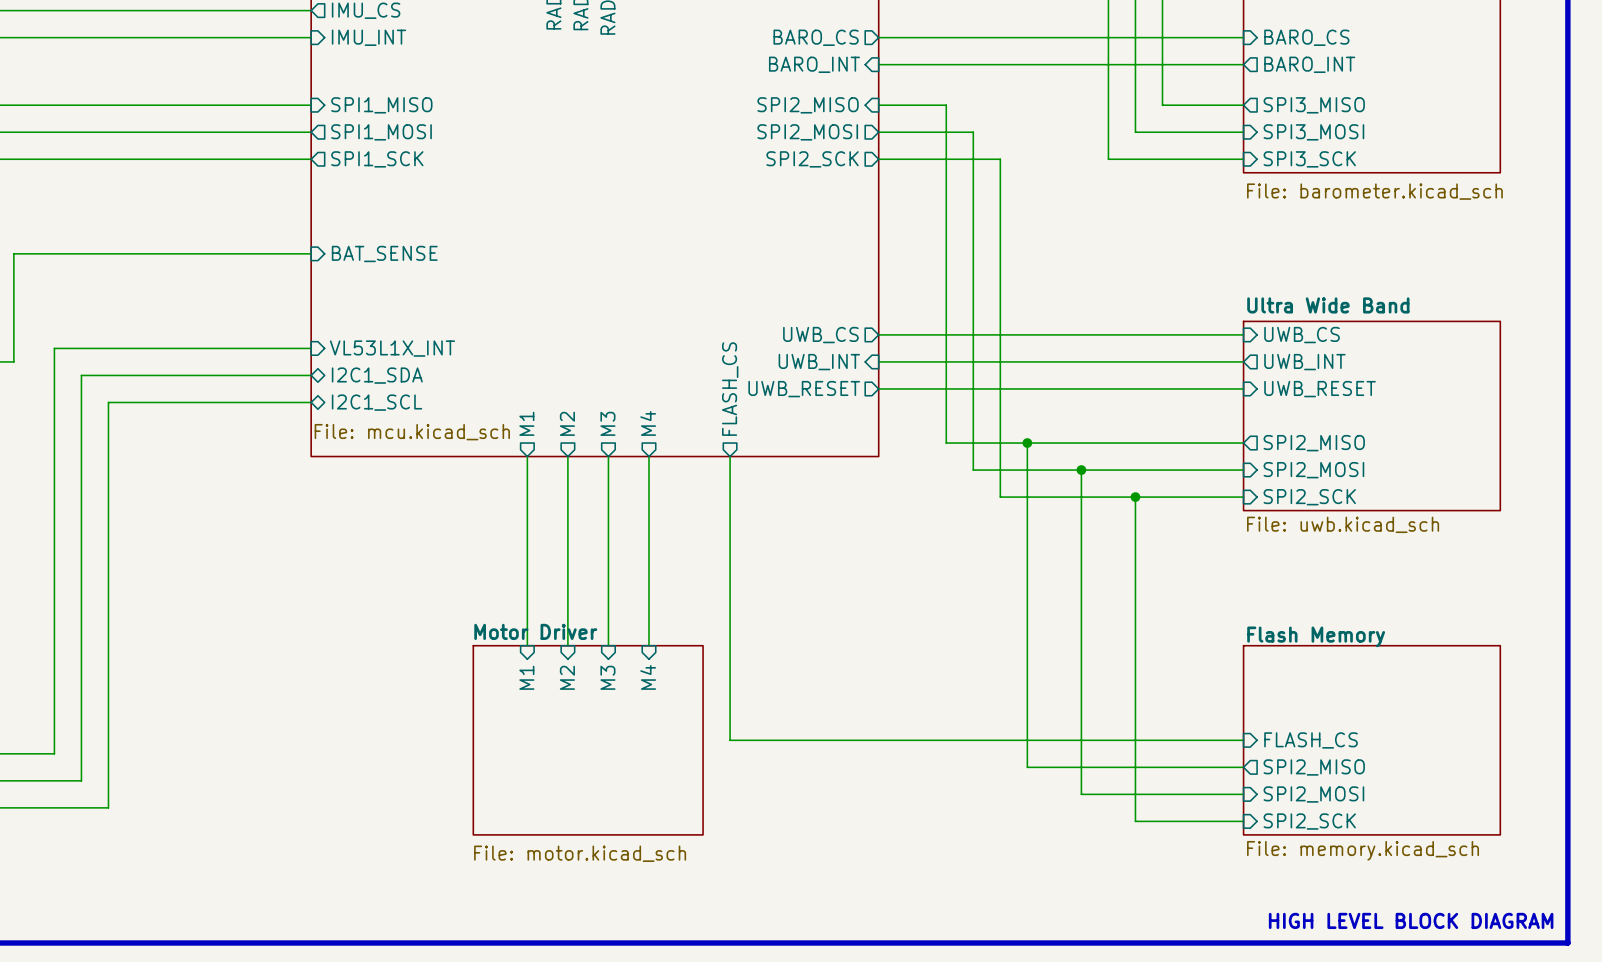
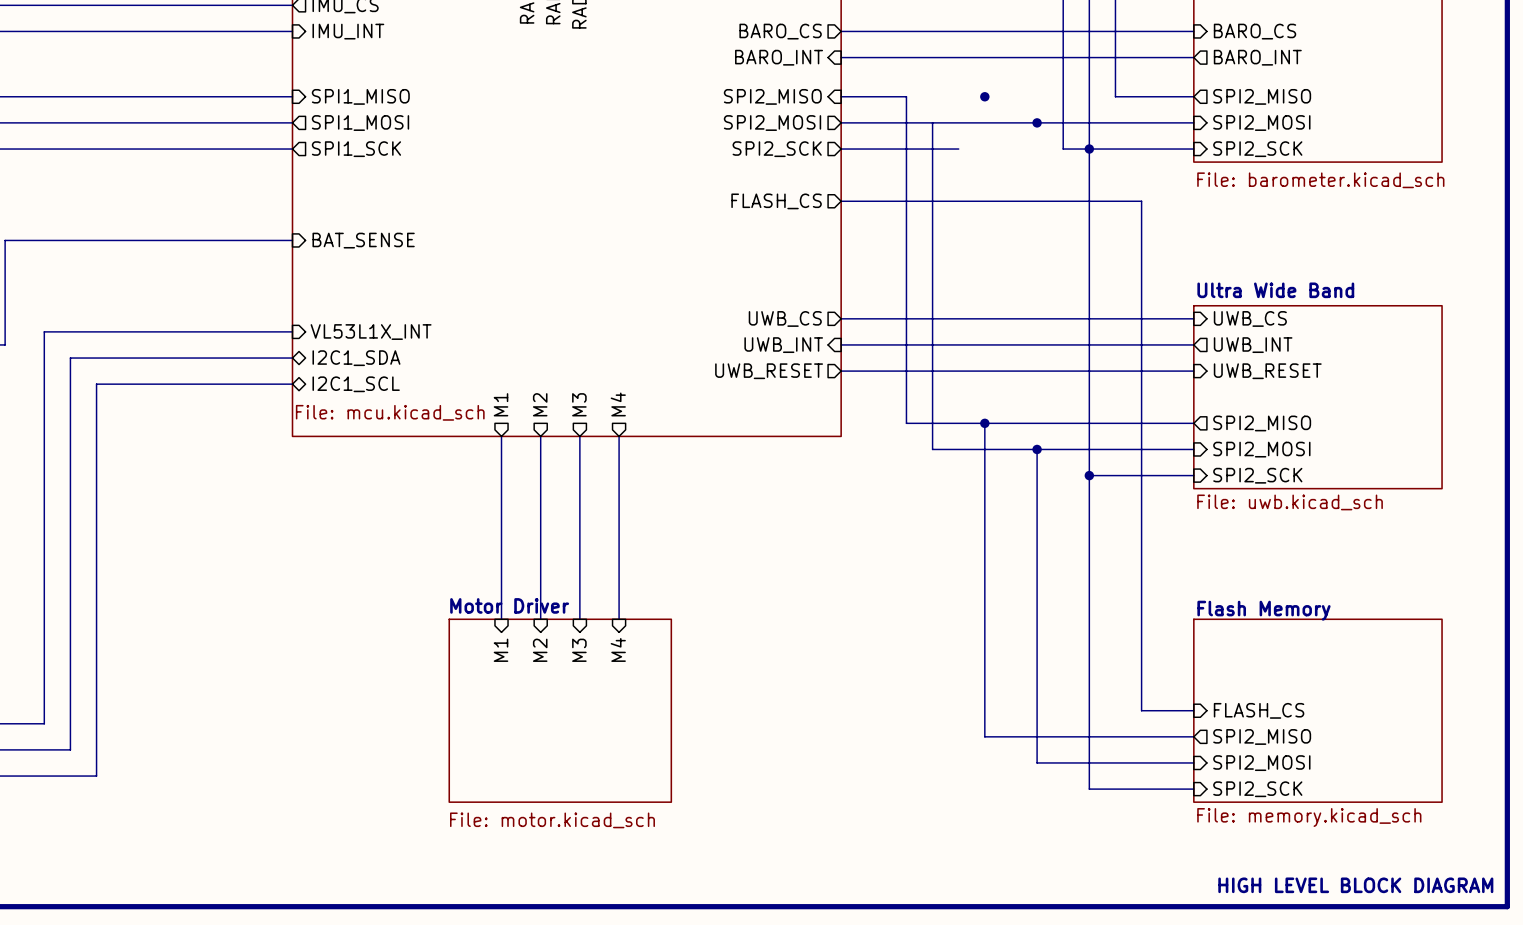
junction: none -> (984, 96)
sheet pin: SPI3_MISO (1314, 105) -> SPI2_MISO (1262, 96)
junction: none -> (1037, 122)
sheet pin: SPI3_MOSI (1313, 132) -> SPI2_MOSI (1261, 123)
wire: (1000, 159) (1000, 497) (1135, 497) -> (932, 122) (1089, 122) (1089, 475)
junction: none -> (1089, 149)
sheet pin: SPI3_SCK (1309, 159) -> SPI2_SCK (1257, 149)
sheet pin rotation: 0° (730, 389) -> 90° counterclockwise (776, 201)
sheet pin position: FLASH_CS (730, 389) -> FLASH_CS (776, 201)
wire: (730, 456) (730, 740) (1189, 740) -> (841, 201) (1141, 201) (1141, 710)

